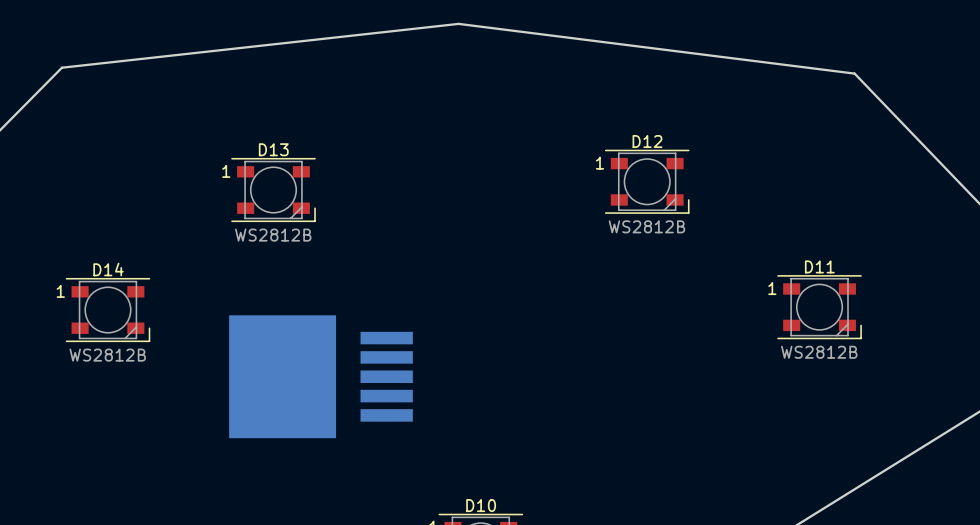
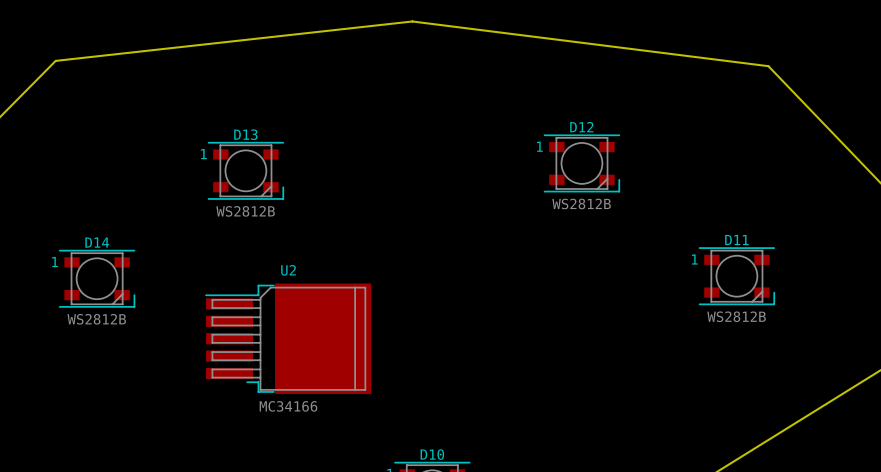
U2 side: bottom (320, 376) -> top (288, 338)

